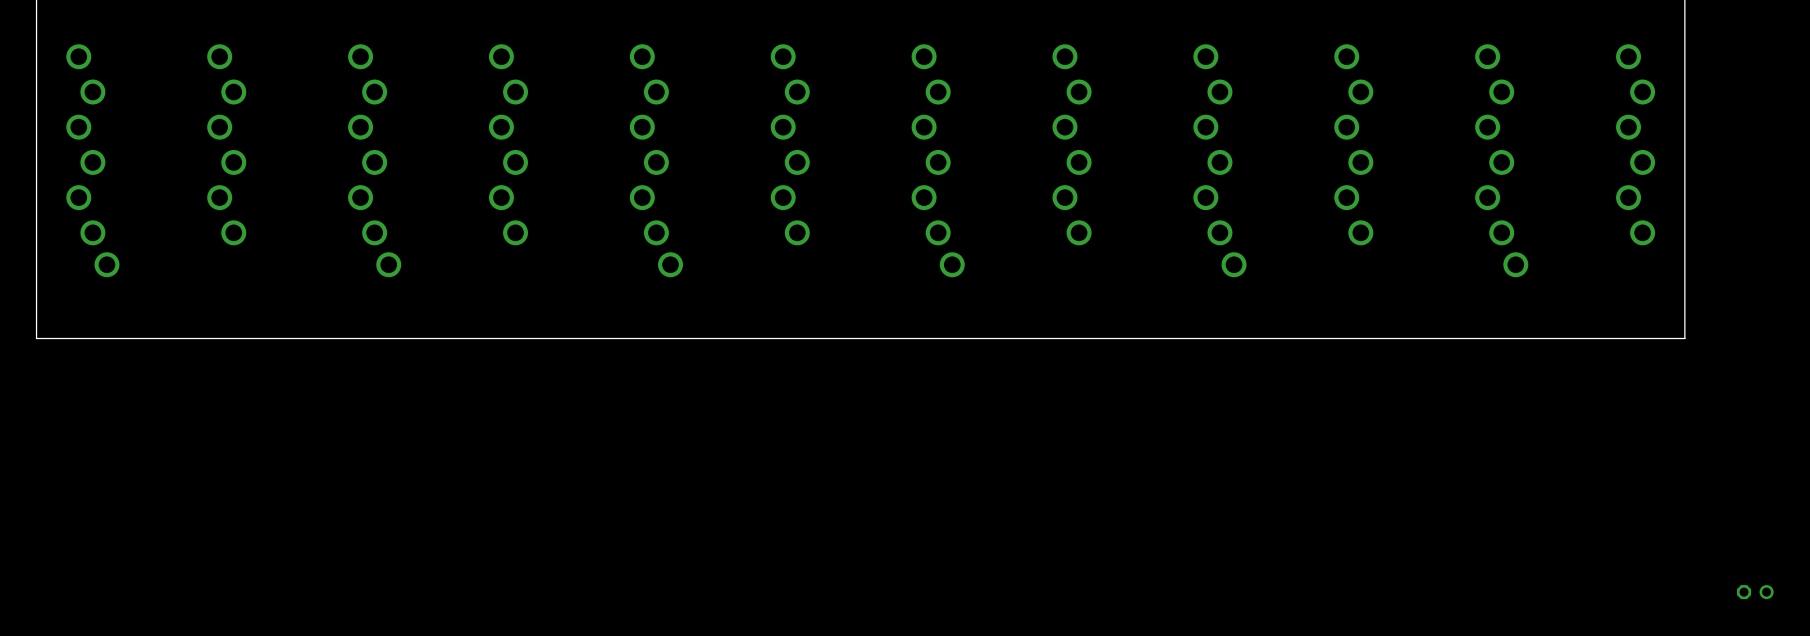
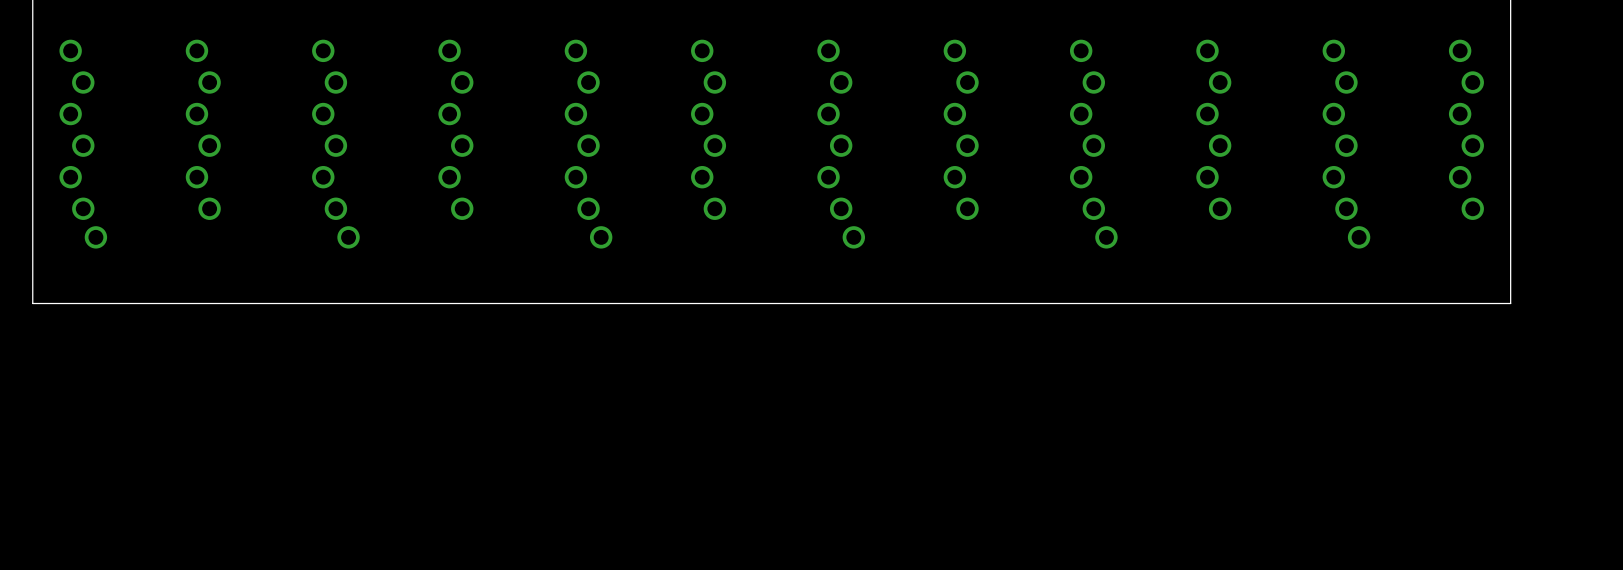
part: (1755, 592) -> none

